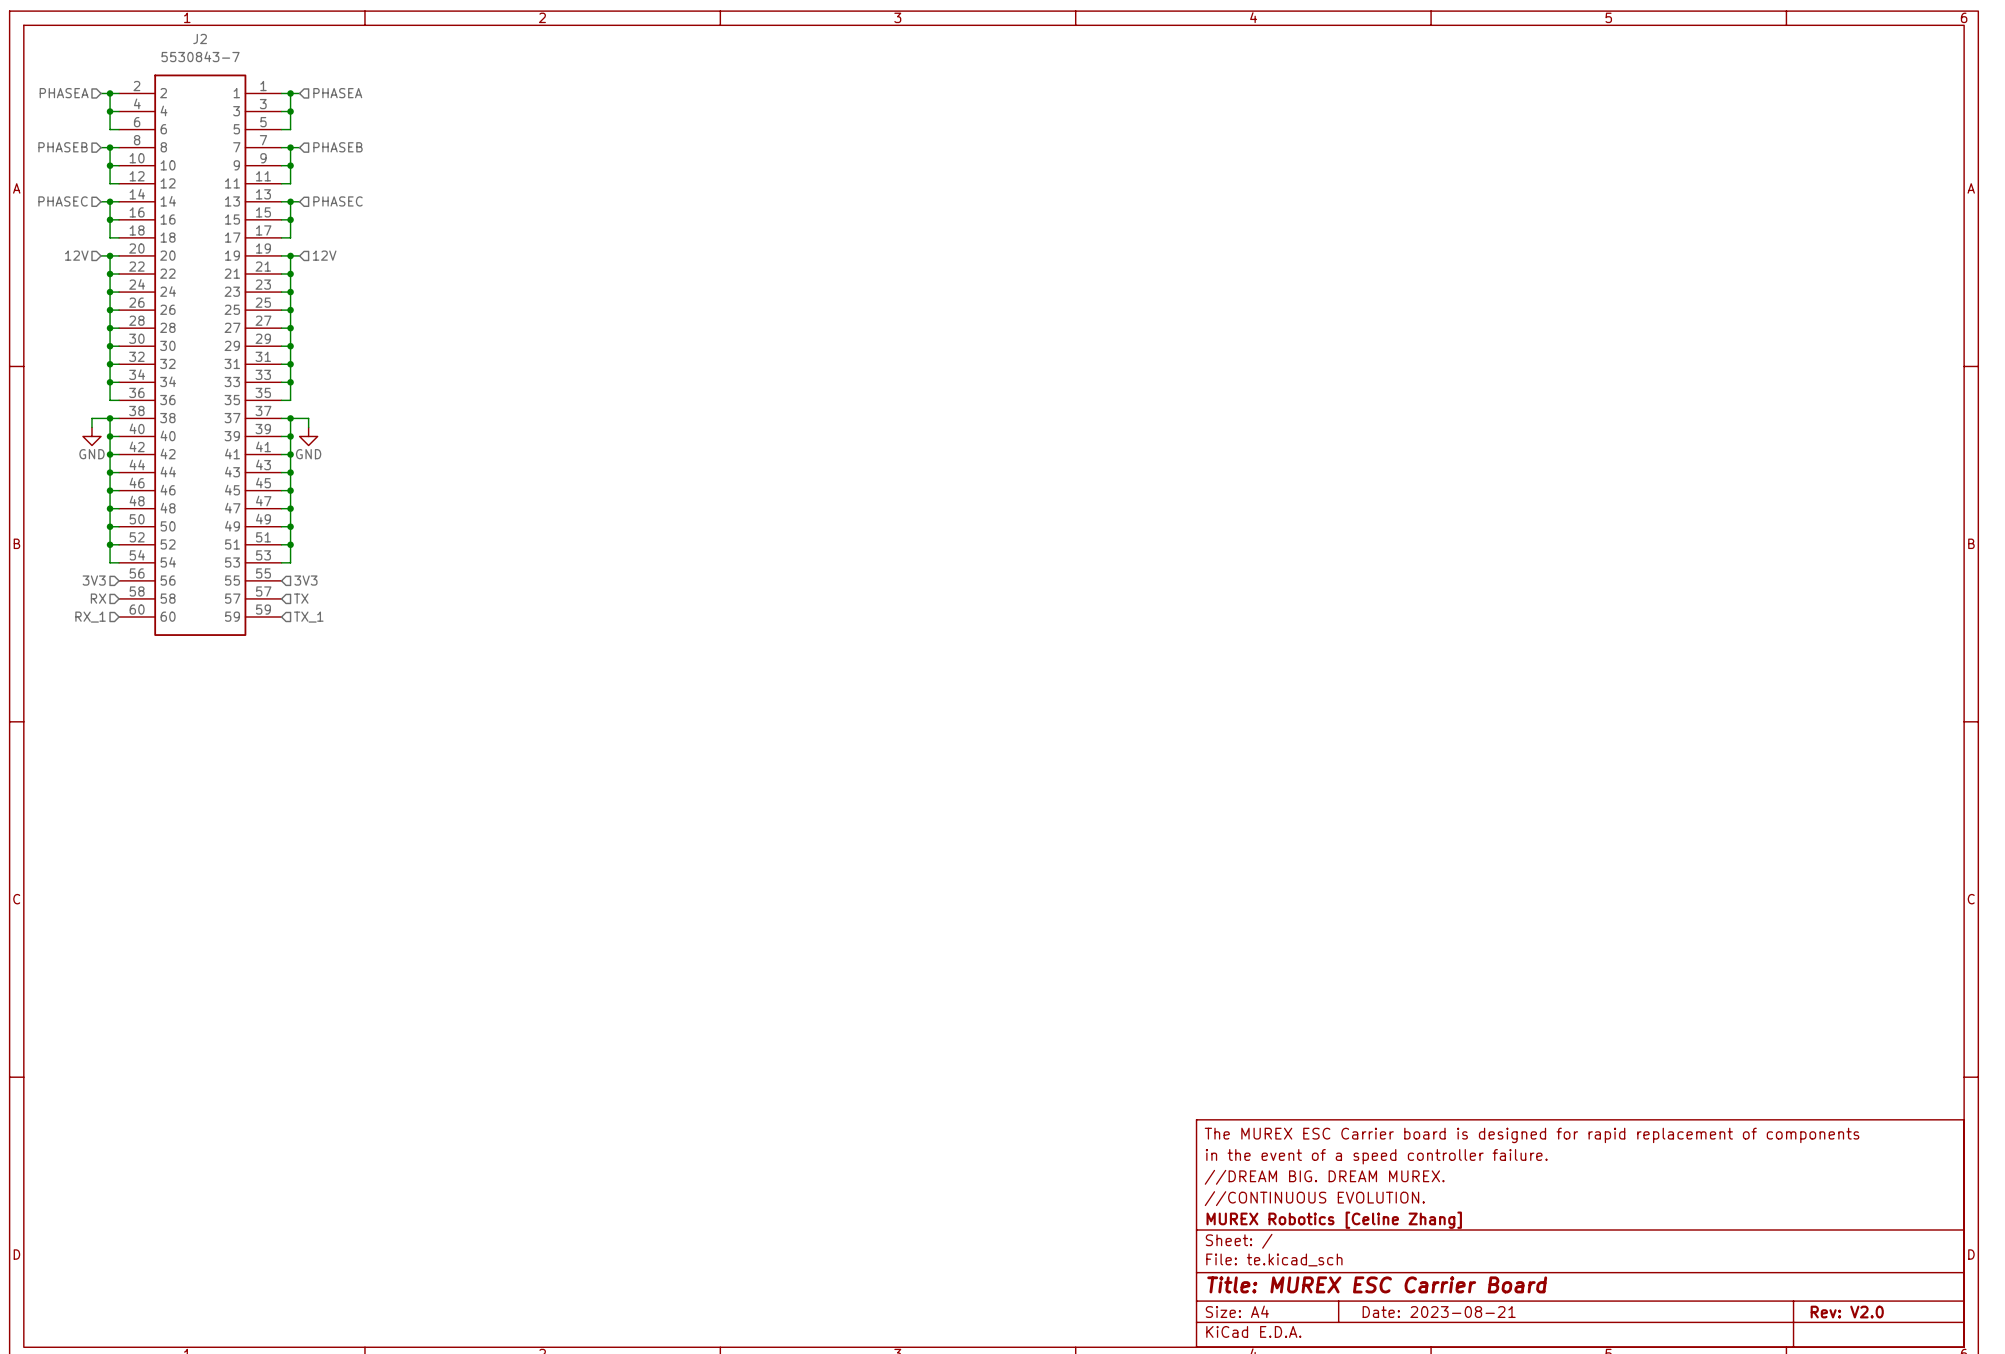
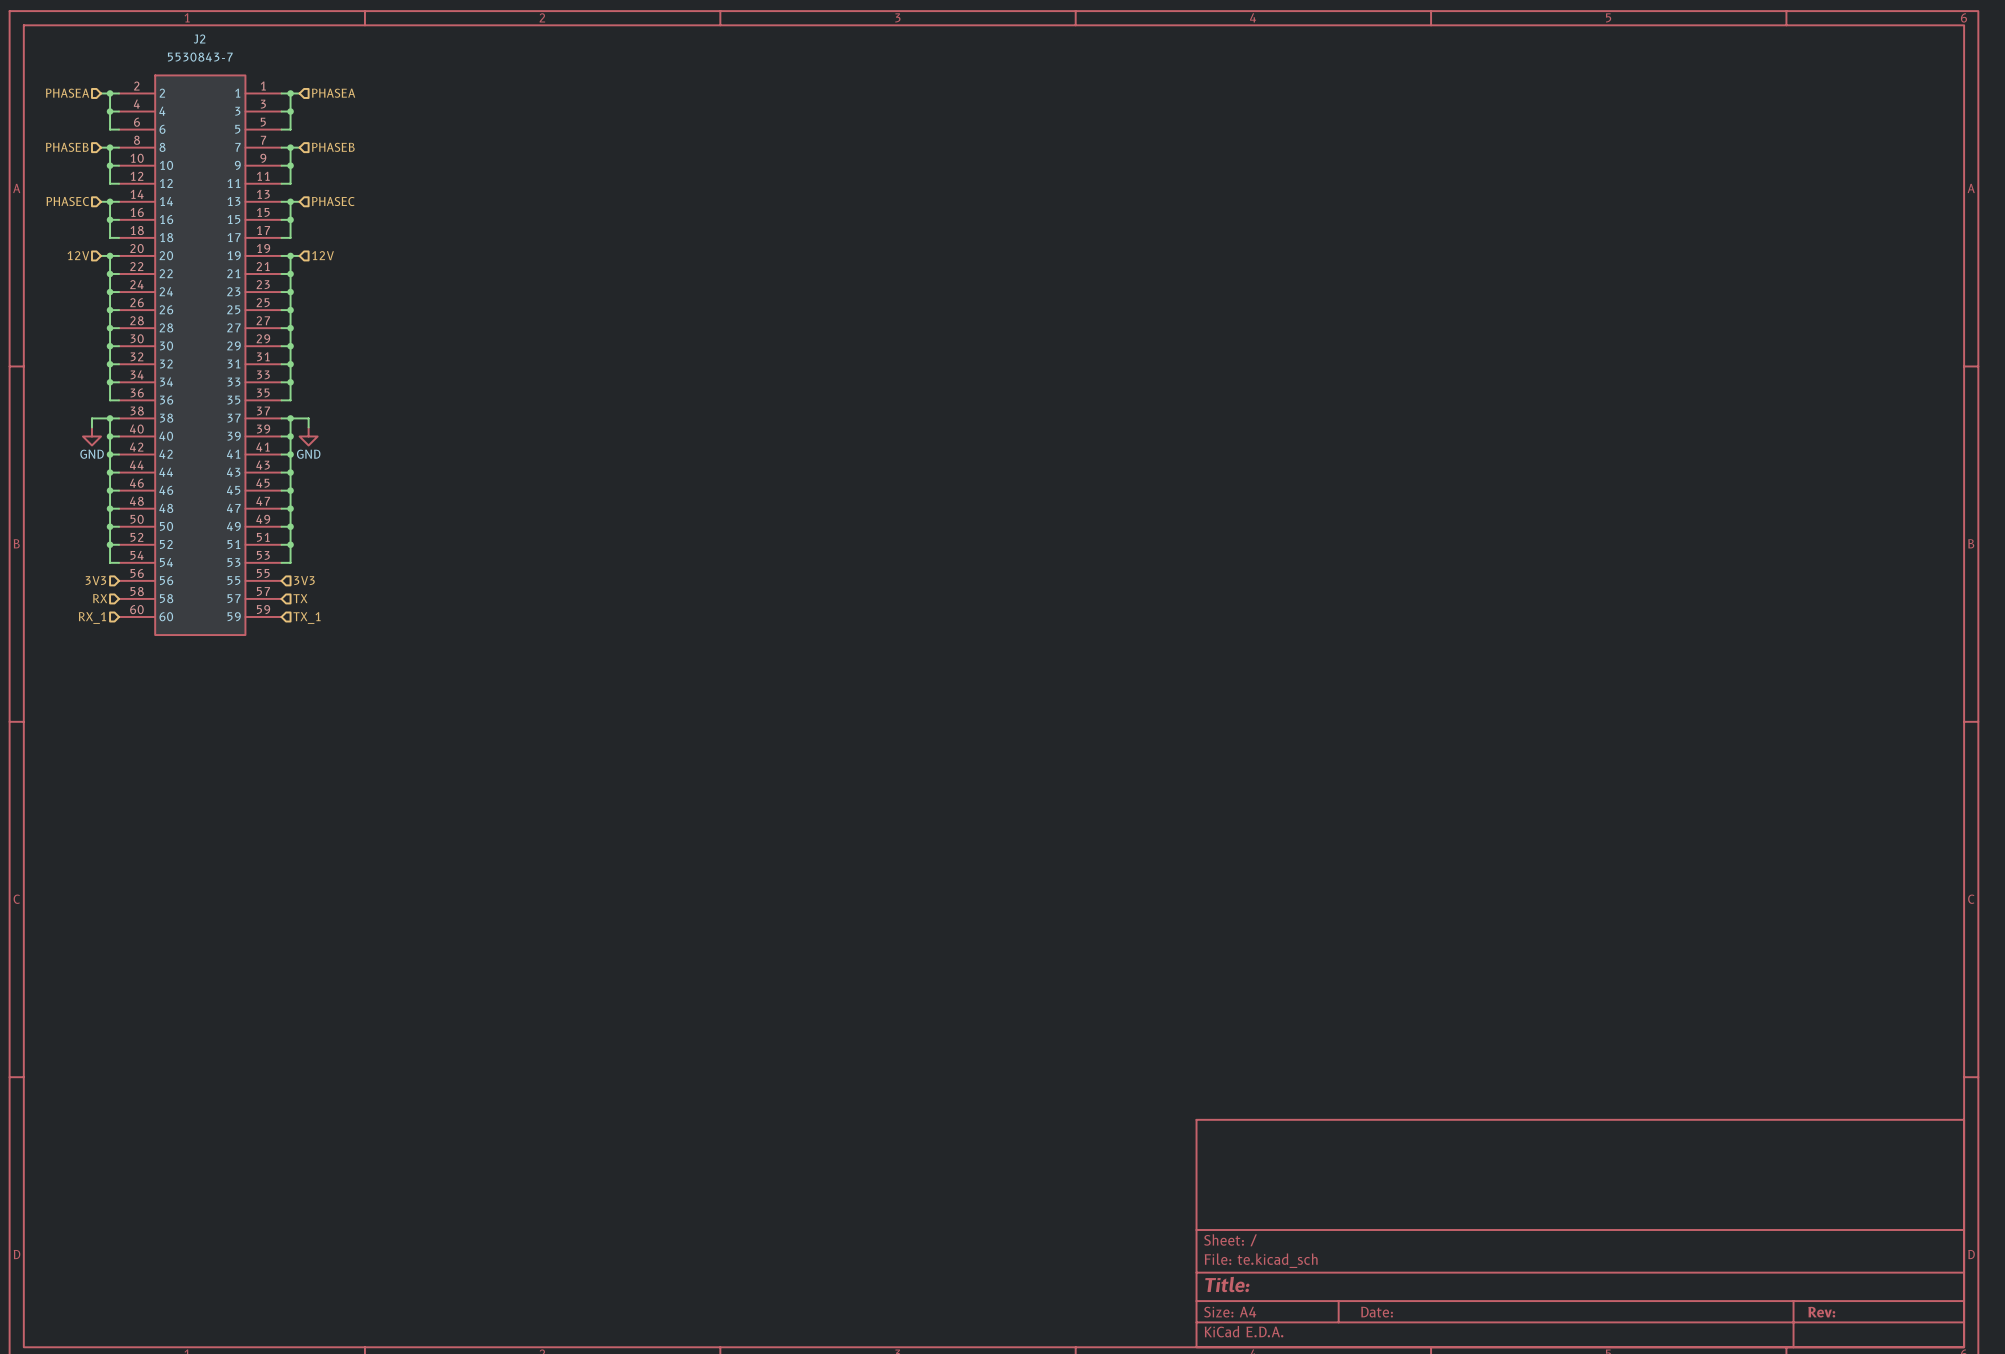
title block: The MUREX ESC Carrier board is designed for rapid replacement of components (1532, 1135) -> none
title block: in the event of a speed controller failure. (1376, 1156) -> none
title block: //DREAM BIG. DREAM MUREX. (1324, 1177) -> none
title block: //CONTINUOUS EVOLUTION. (1314, 1198) -> none
title block: MUREX Robotics [Celine Zhang] (1334, 1220) -> none
title block: Title: MUREX ESC Carrier Board (1377, 1284) -> Title: (1227, 1284)
title block: Date: 2023-08-21 (1439, 1312) -> Date: (1377, 1312)
title block: Rev: V2.0 (1847, 1312) -> Rev: (1821, 1312)

